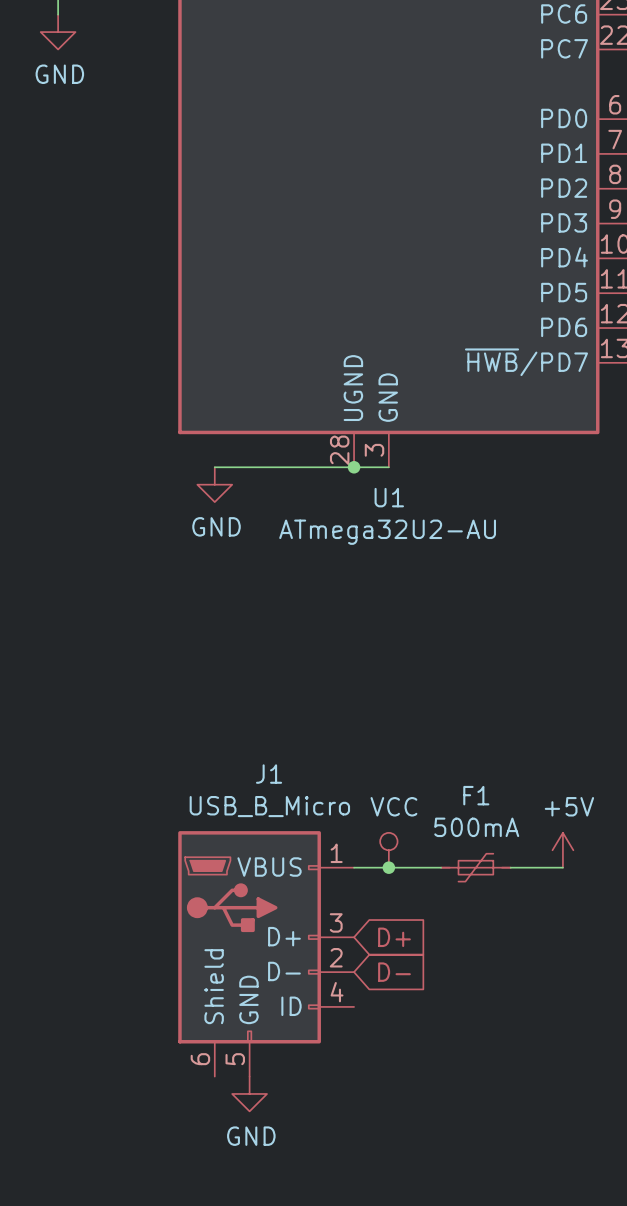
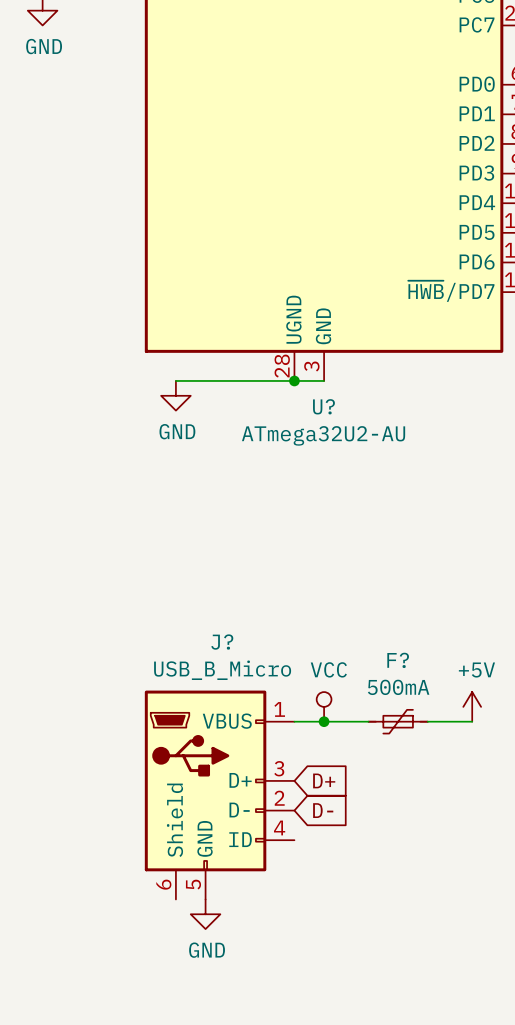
U1 name: U1 (389, 497) -> U? (323, 406)
J1 name: J1 (269, 774) -> J? (222, 642)
F1 name: F1 (476, 795) -> F? (398, 660)

